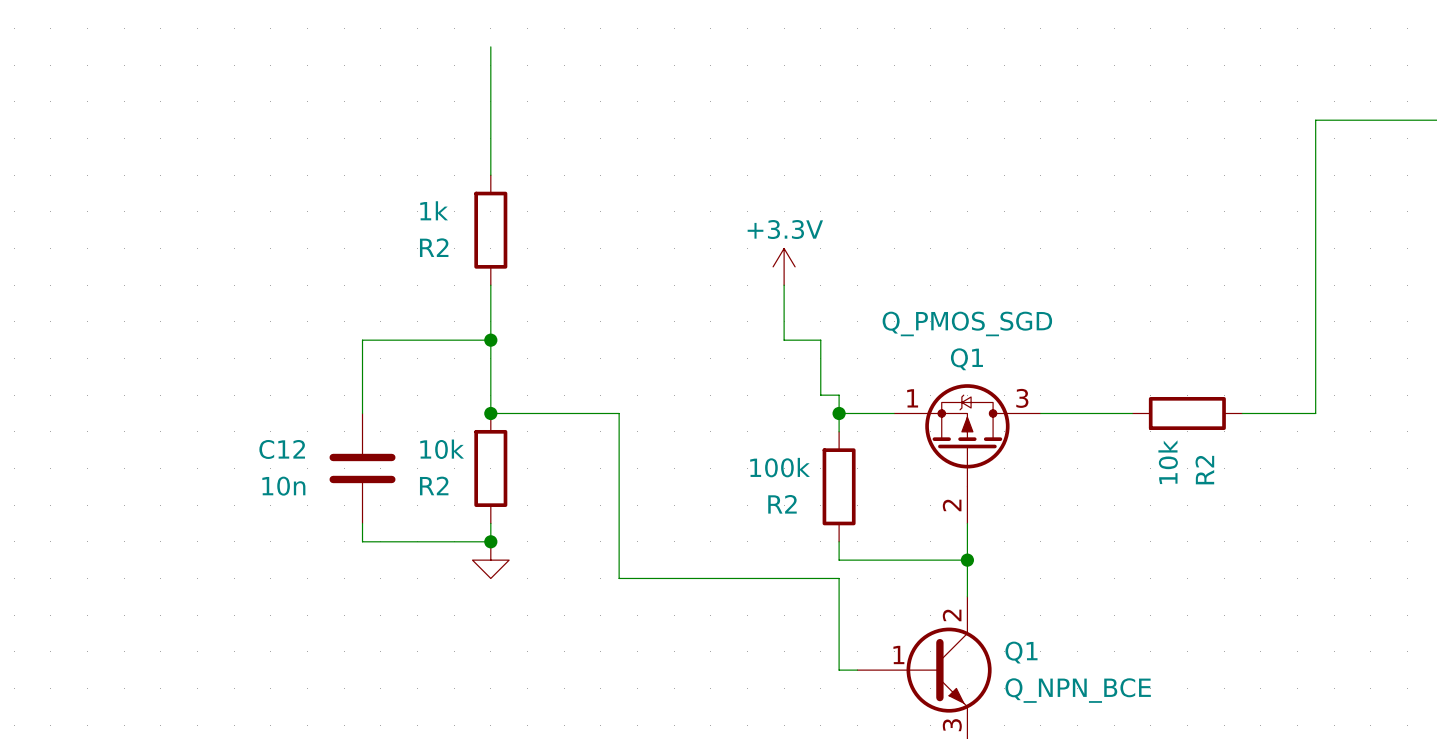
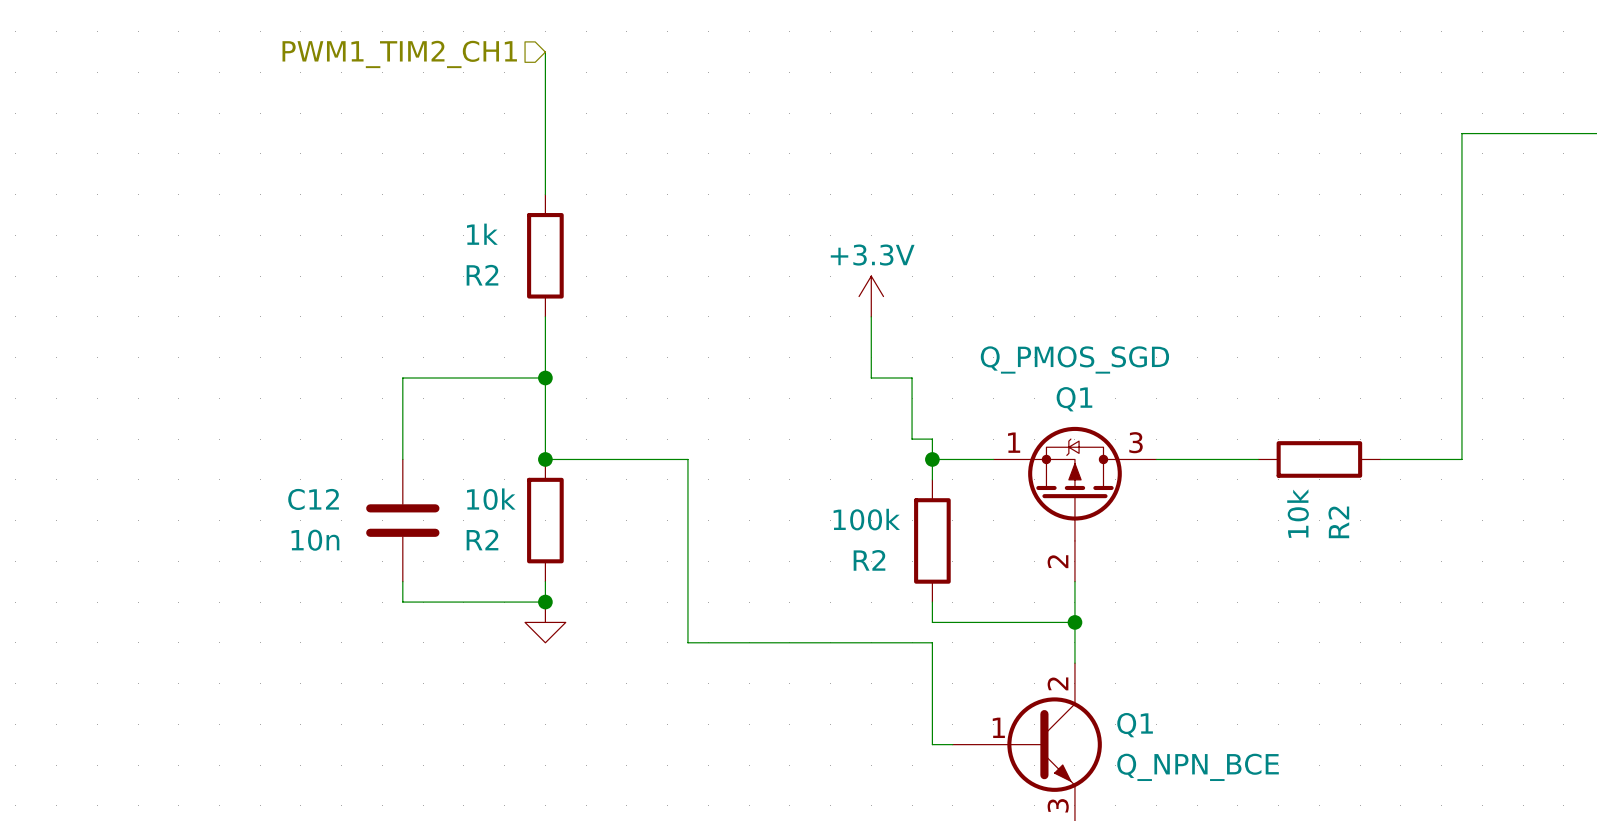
hierarchical label: none -> PWM1_TIM2_CH1 (399, 54)

